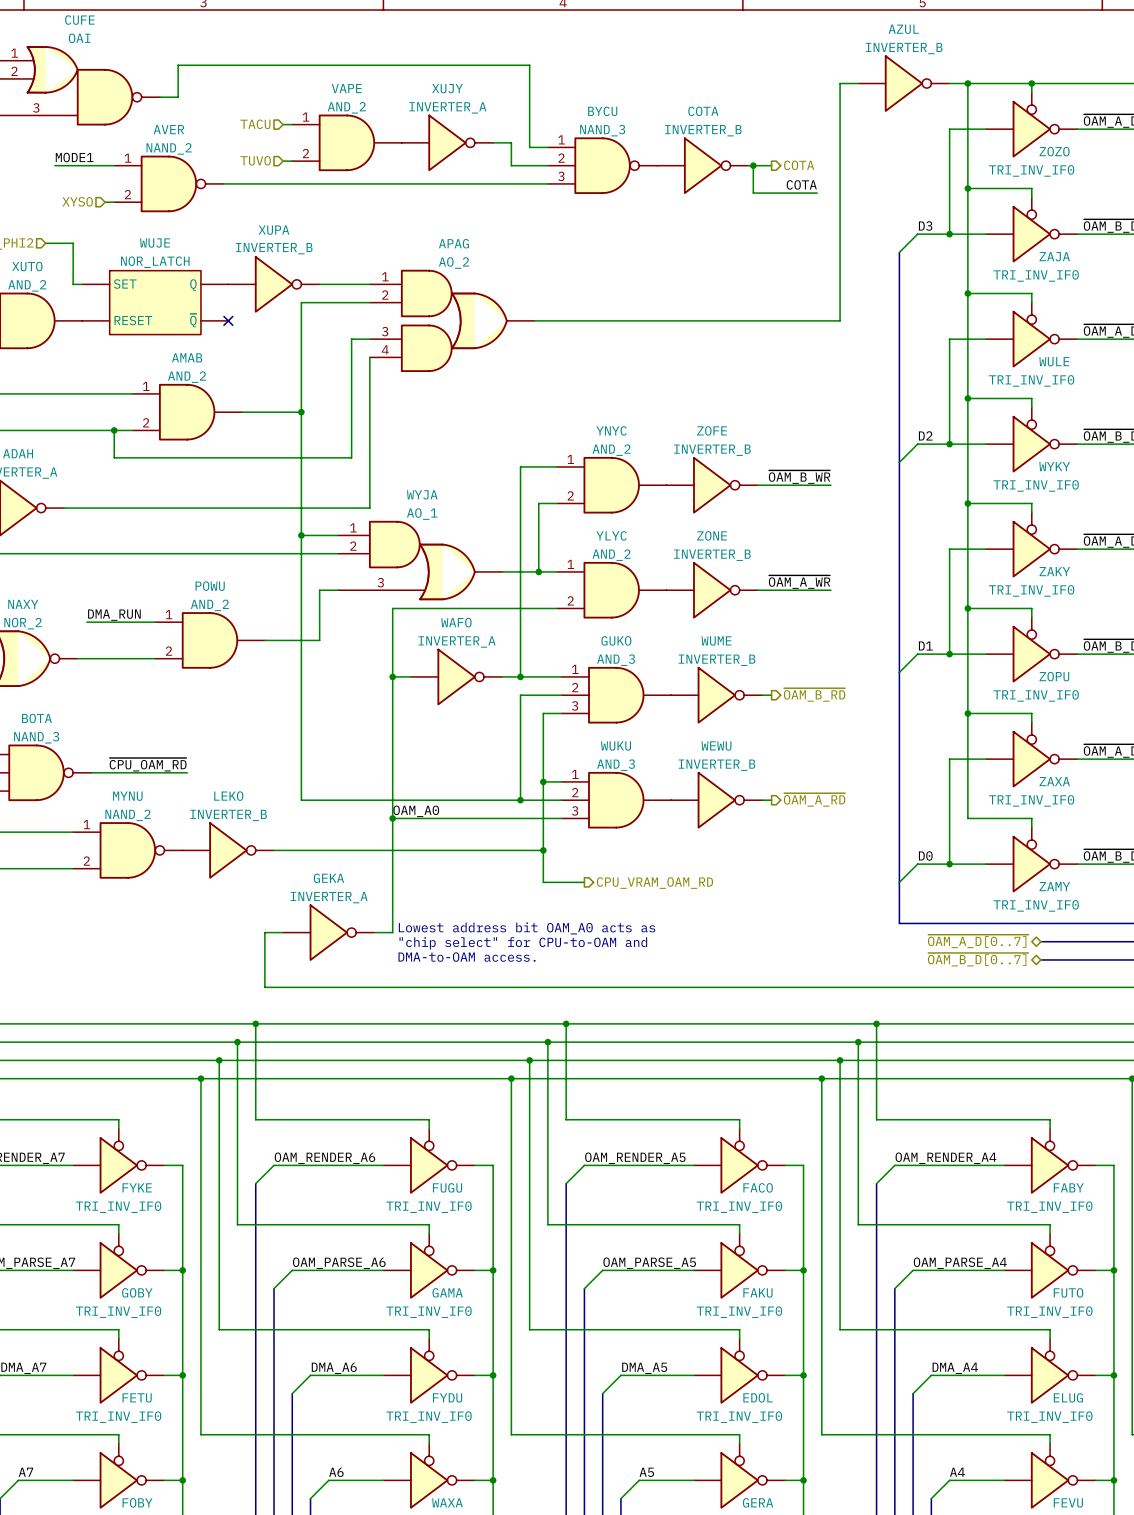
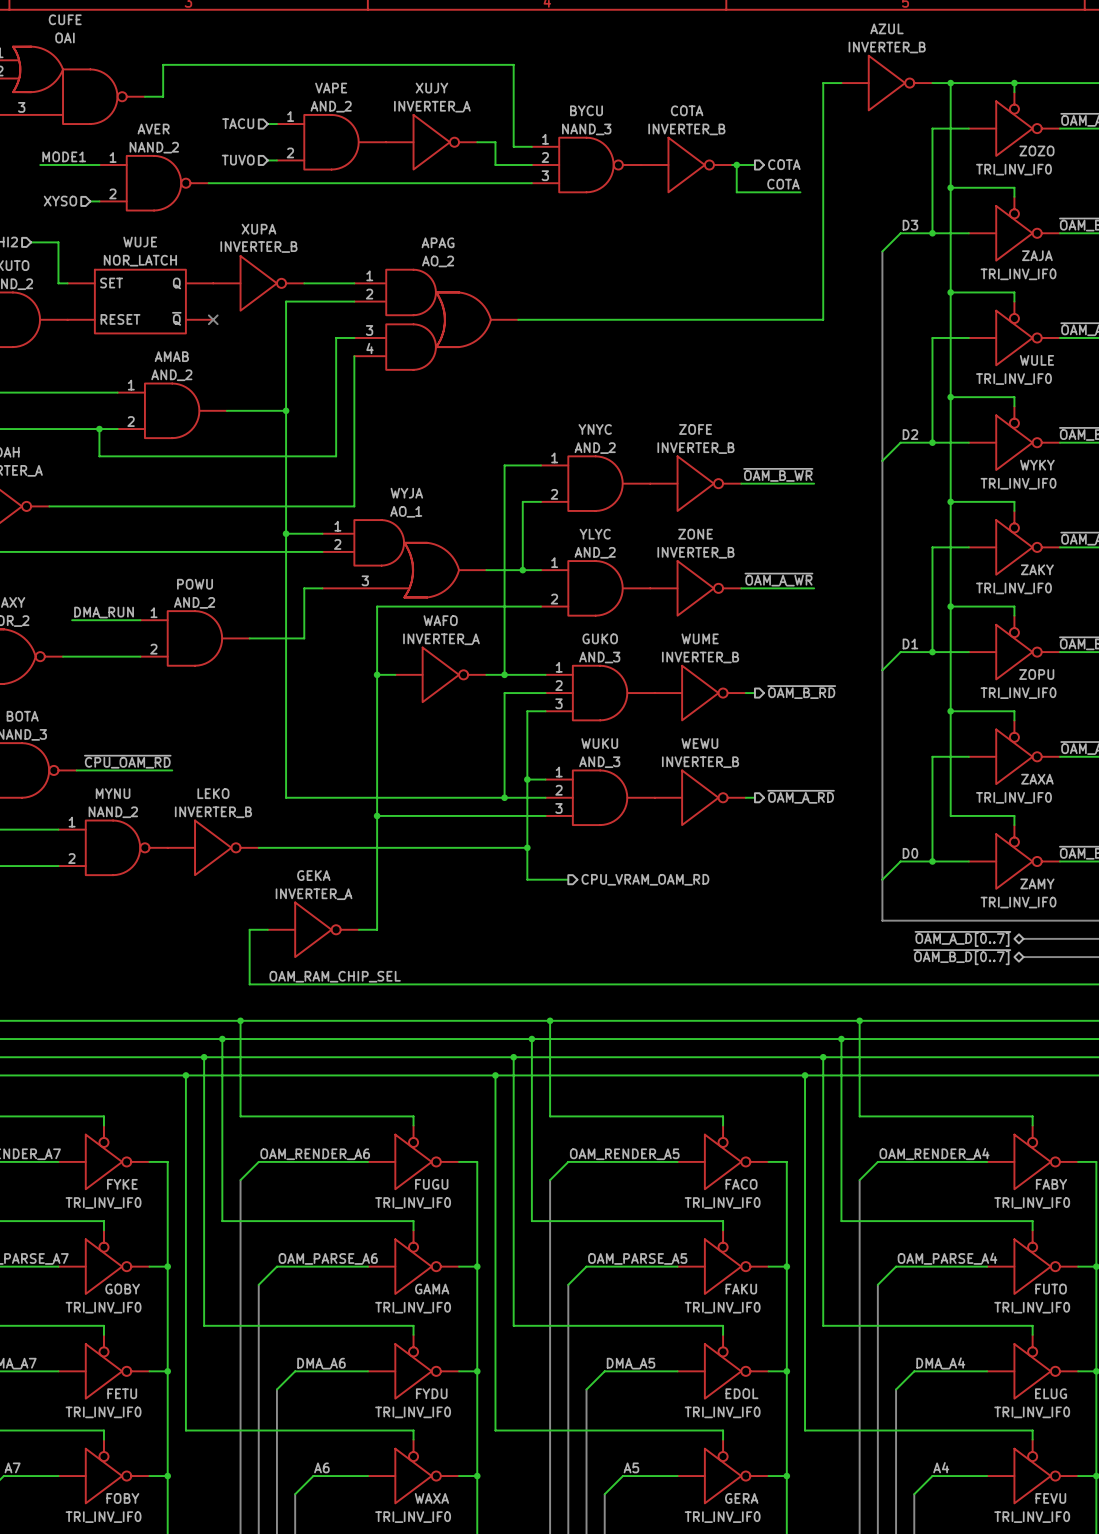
label: OAM_A0 (416, 811) -> none
text: Lowest address bit OAM_A0 acts as (527, 928) -> none
text: "chip select" for CPU-to-OAM and (523, 943) -> none
text: DMA-to-OAM access. (467, 957) -> none
label: none -> OAM_RAM_CHIP_SEL (335, 976)

